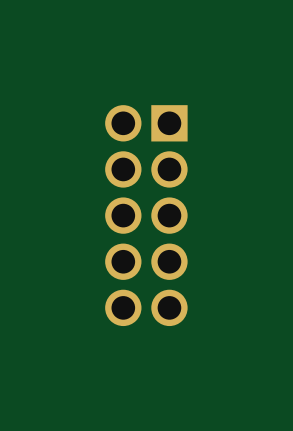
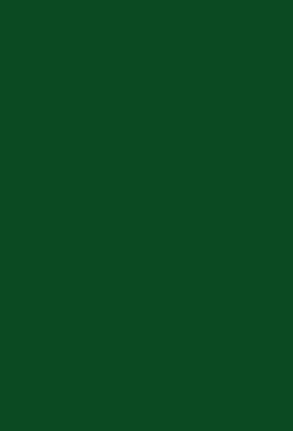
part: (146, 215) -> none

